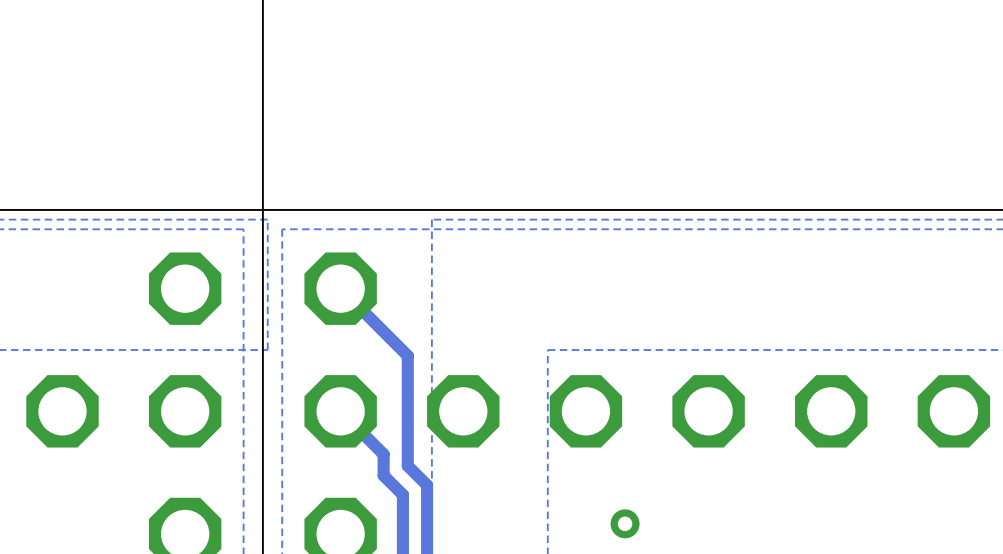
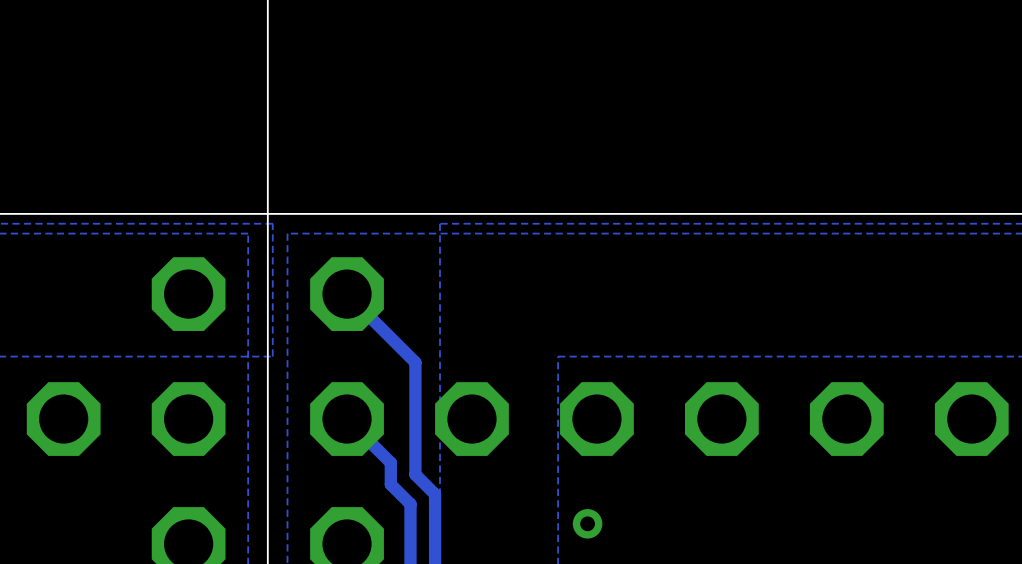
via: none -> (587, 523)
via: (625, 523) -> none

